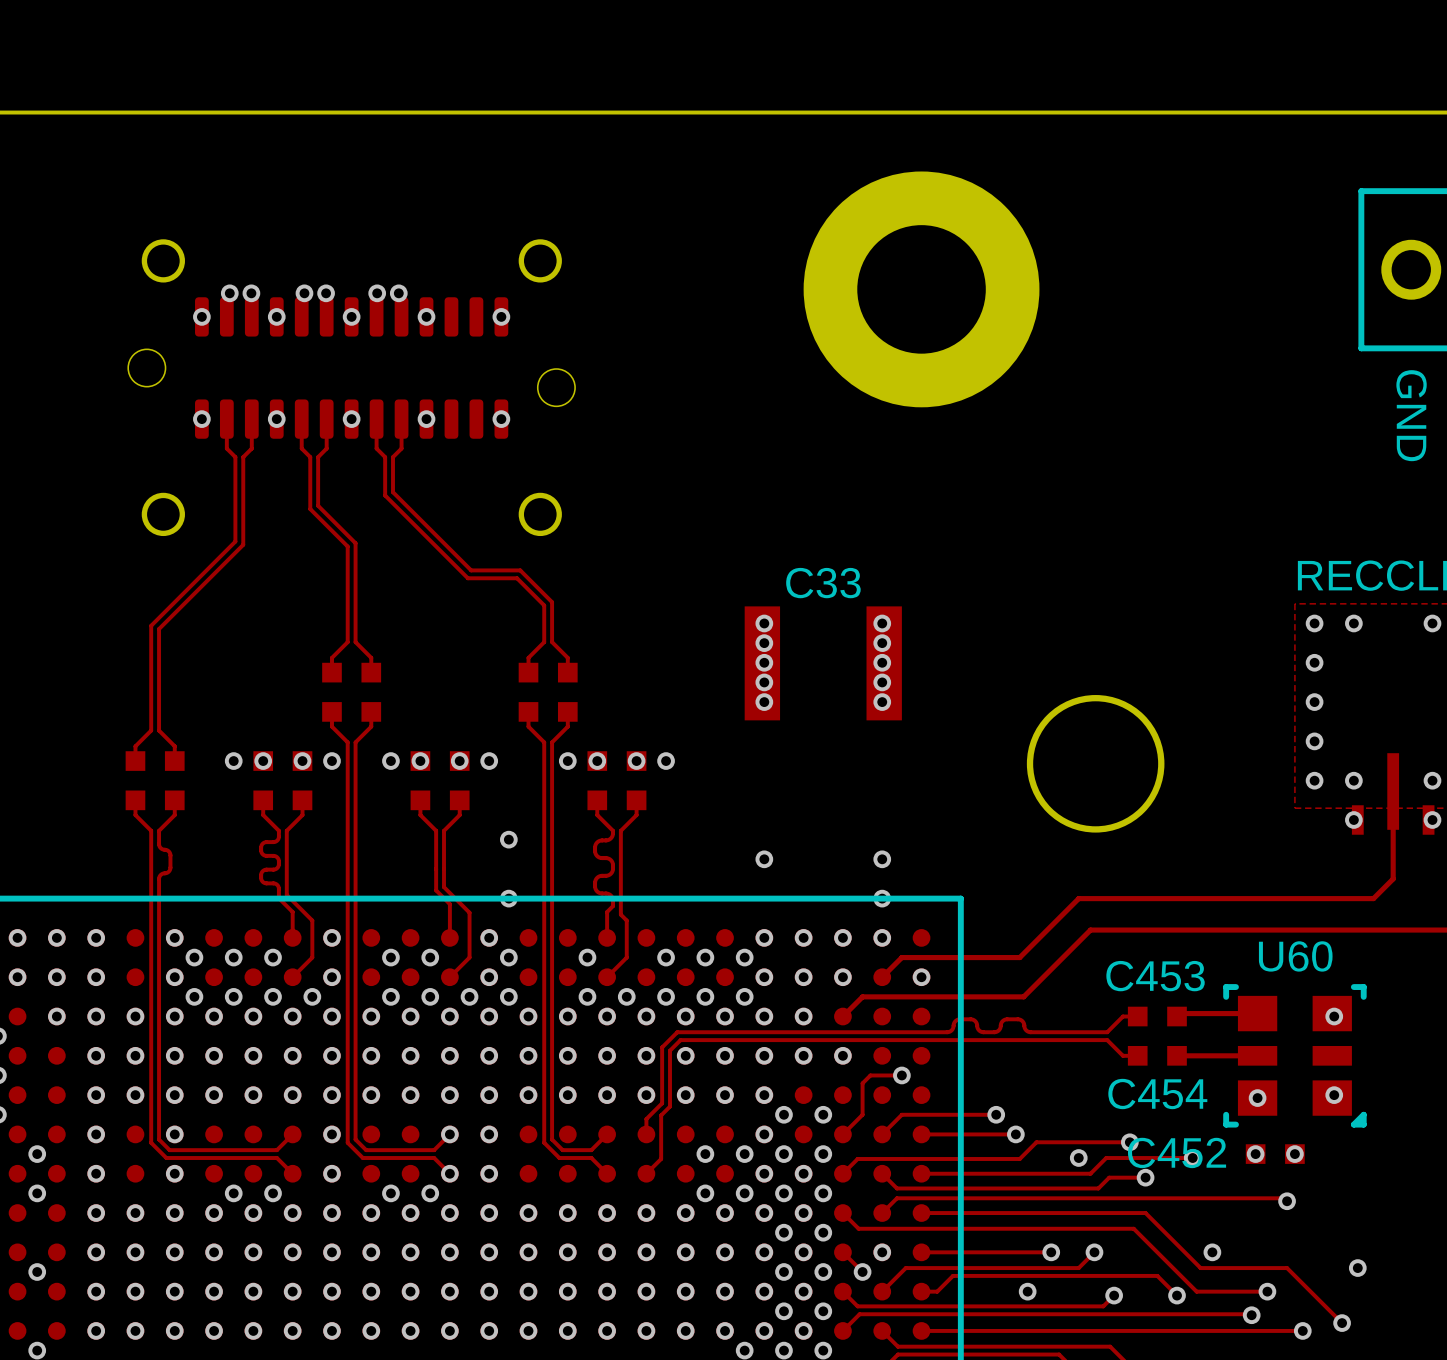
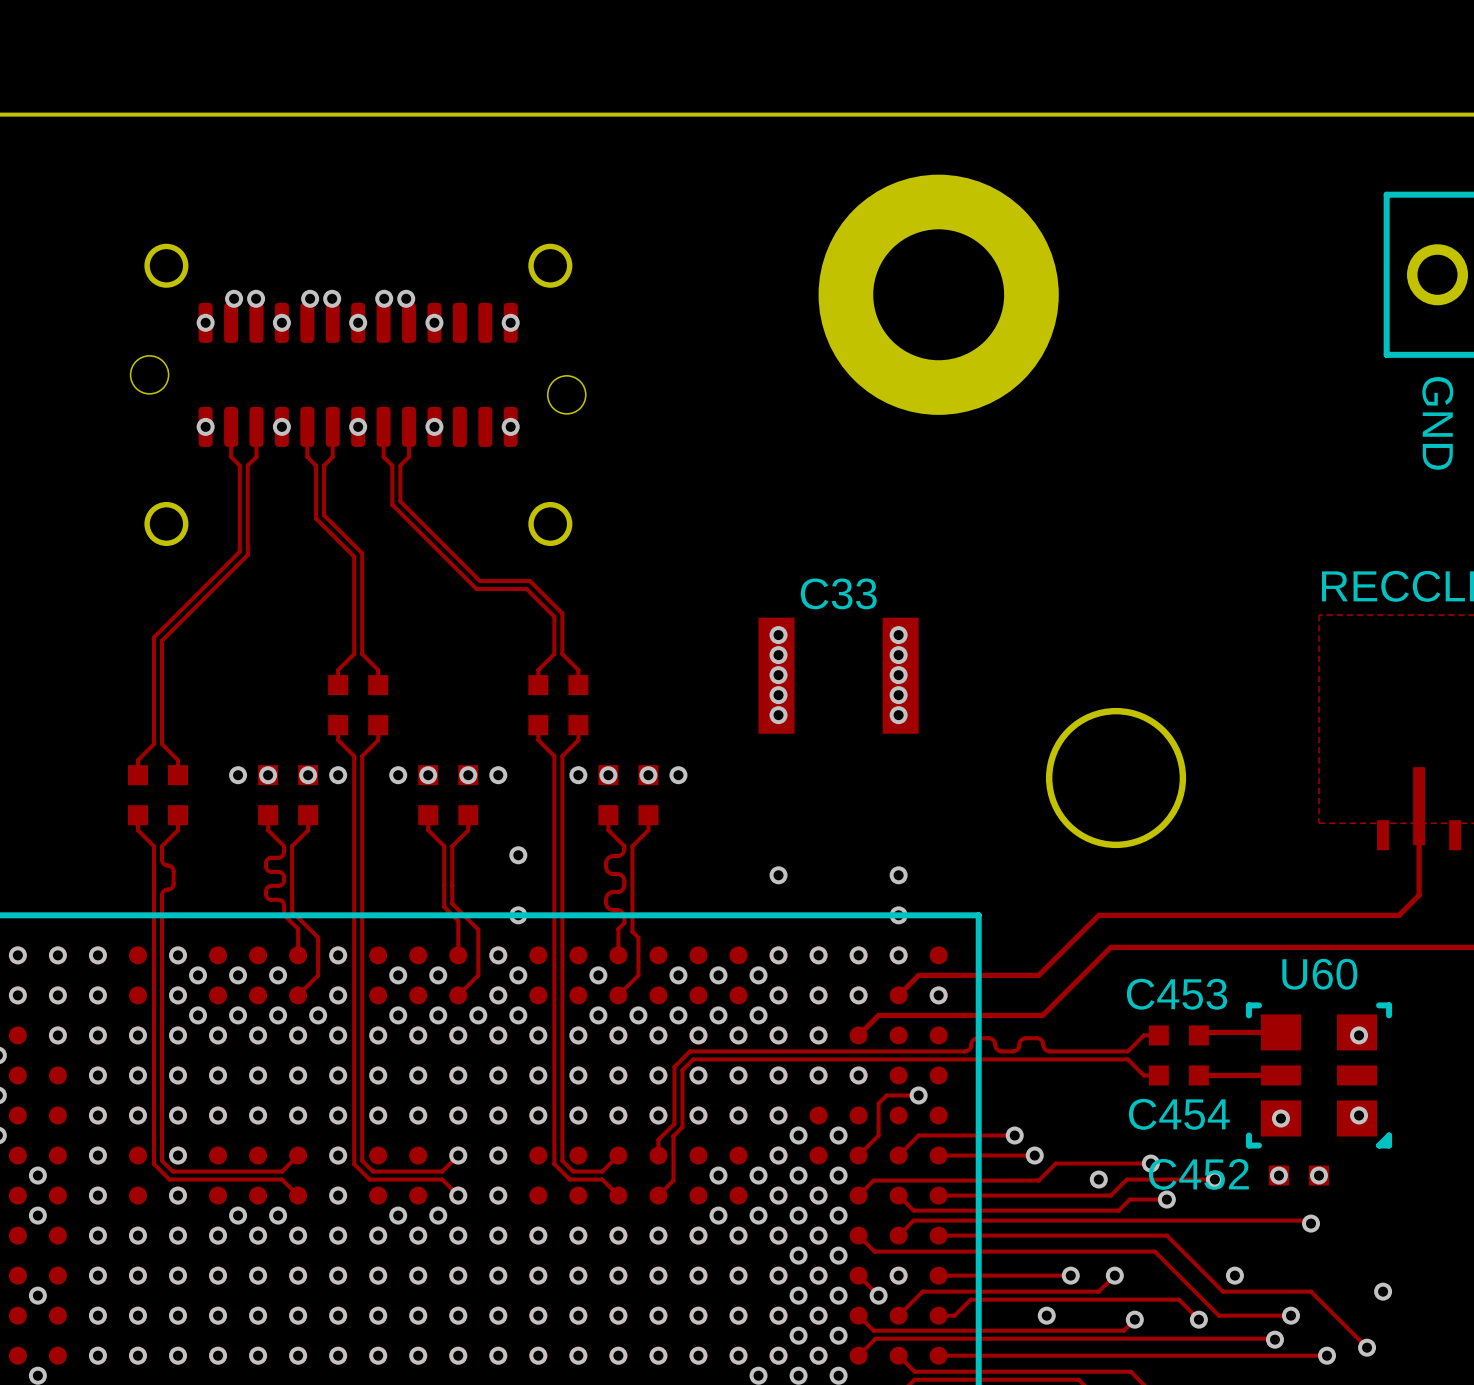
via: (1314, 623) -> none
via: (1353, 623) -> none
via: (1432, 623) -> none
via: (1314, 662) -> none
via: (1314, 702) -> none
via: (1314, 741) -> none
via: (1314, 780) -> none
via: (1353, 780) -> none
via: (1432, 780) -> none
via: (1353, 820) -> none
via: (1432, 820) -> none

